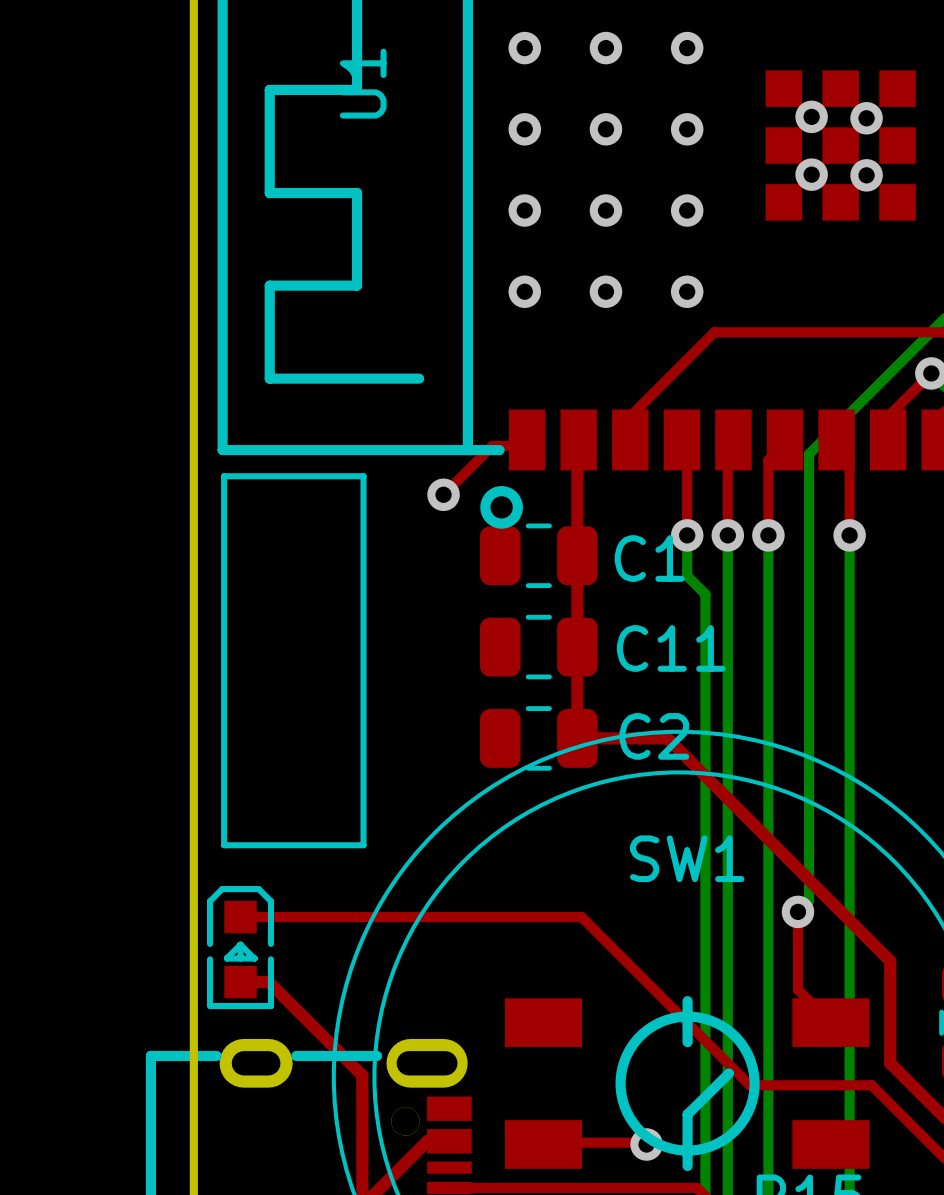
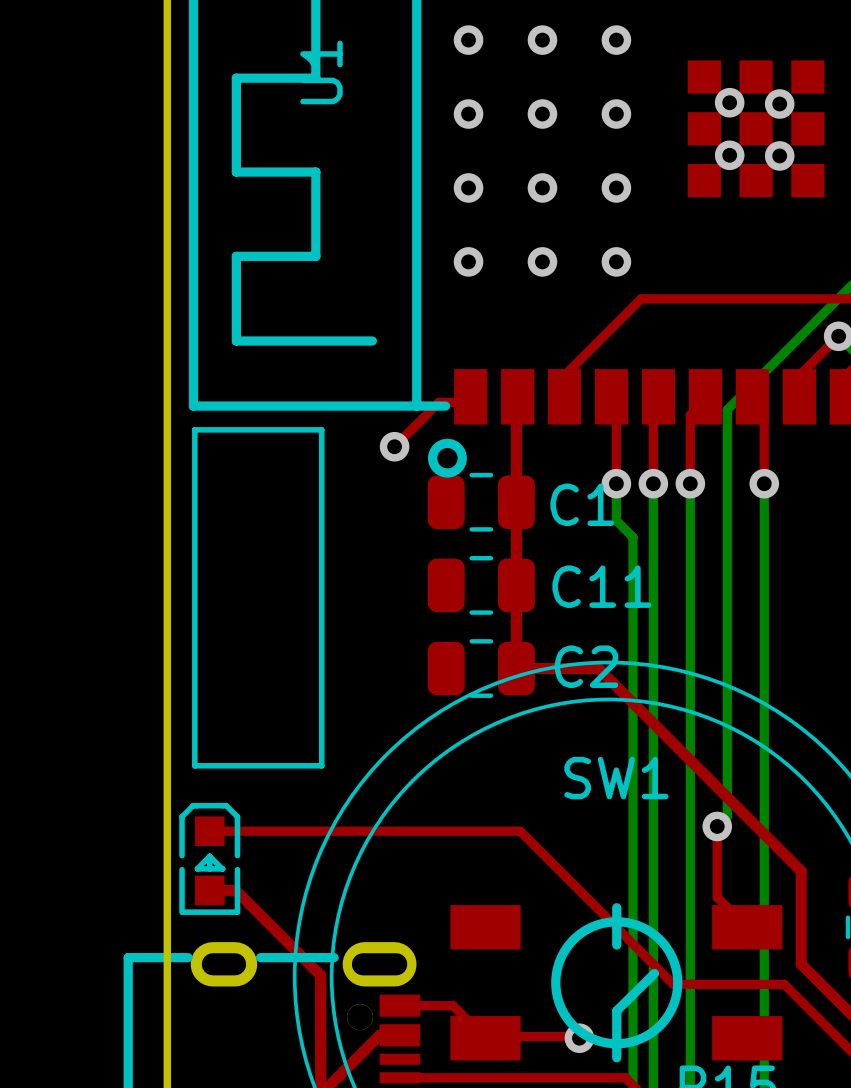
top track: none -> (399, 1005) (453, 1005) (485, 1038)

